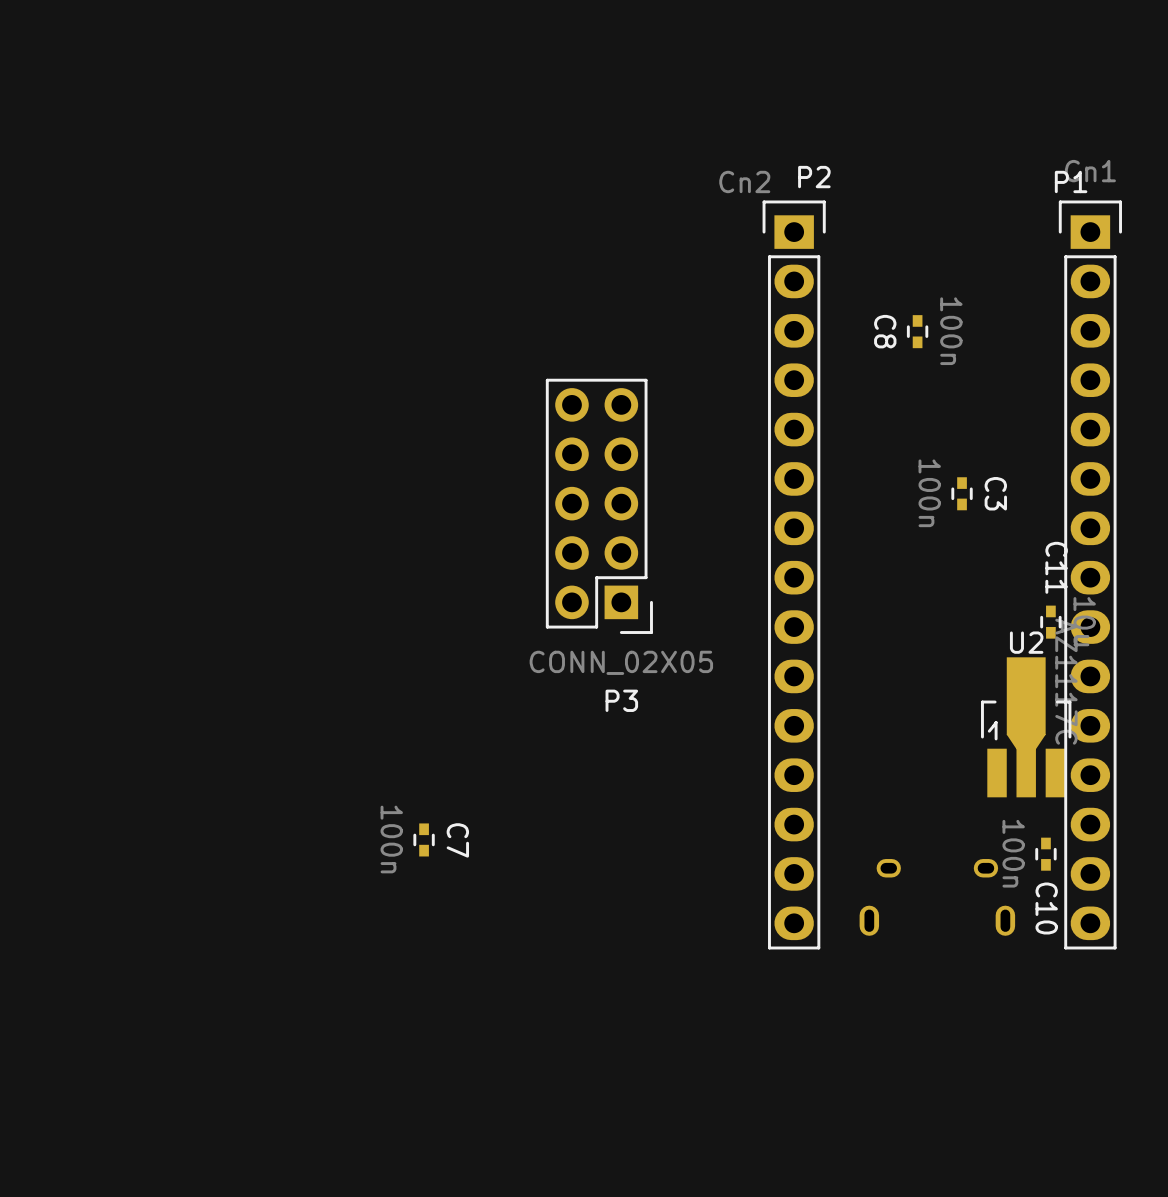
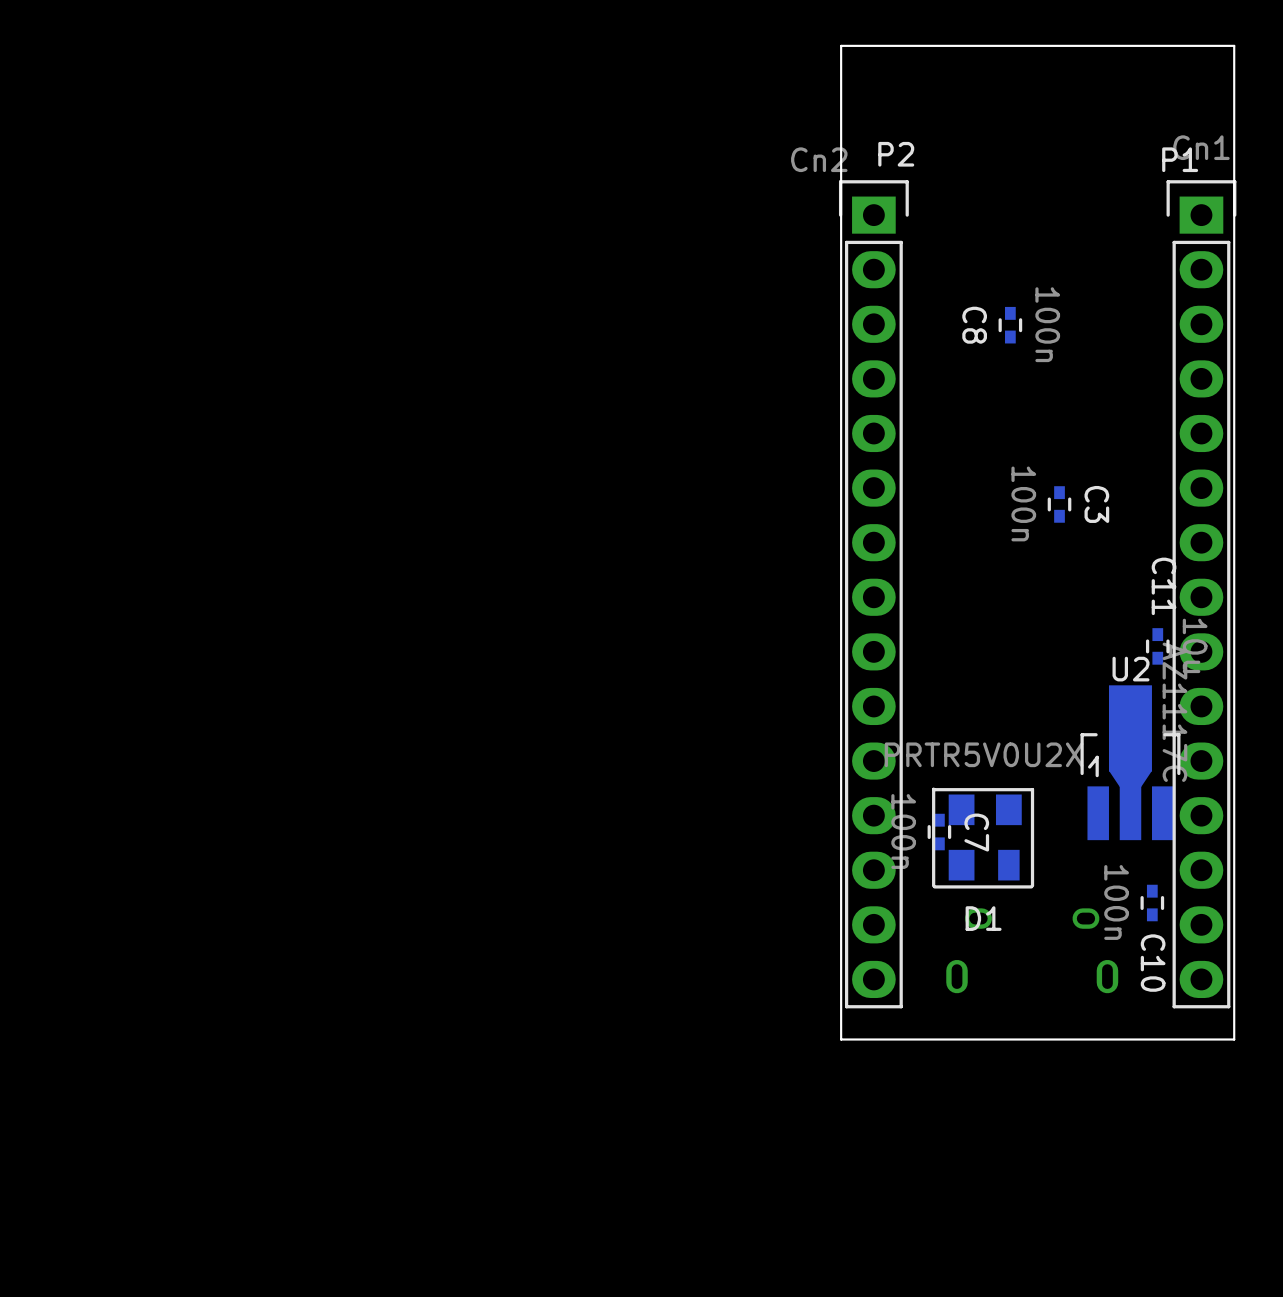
board edge: none -> (1234, 45) (841, 45) (841, 1039) (1234, 1039) (1234, 45)
P3: CONN_02X05 (599, 506) -> none
D1: none -> PRTR5V0U2X (983, 838)
C7 position: (424, 839) -> (939, 832)

